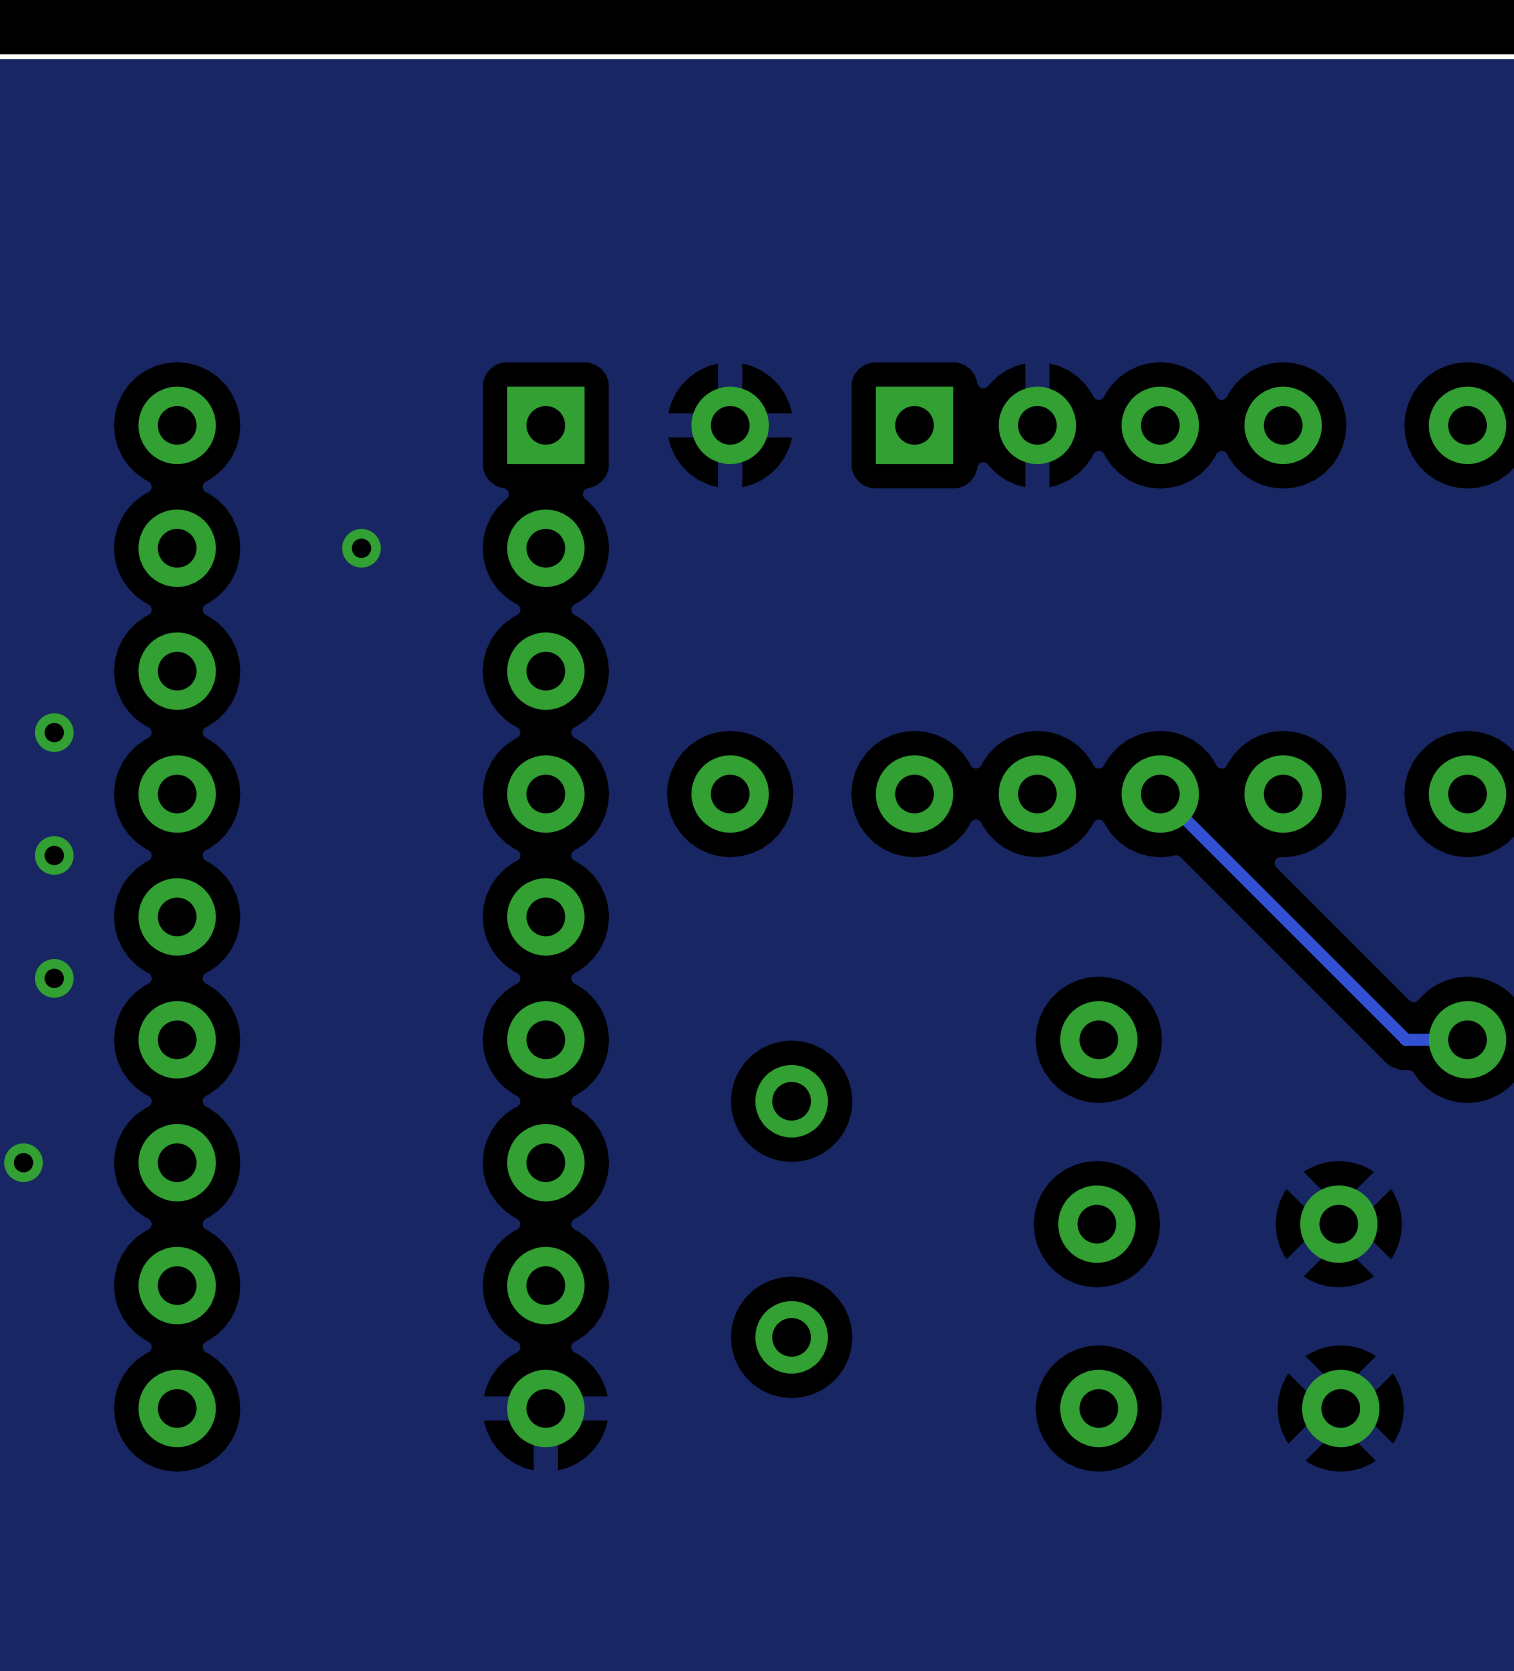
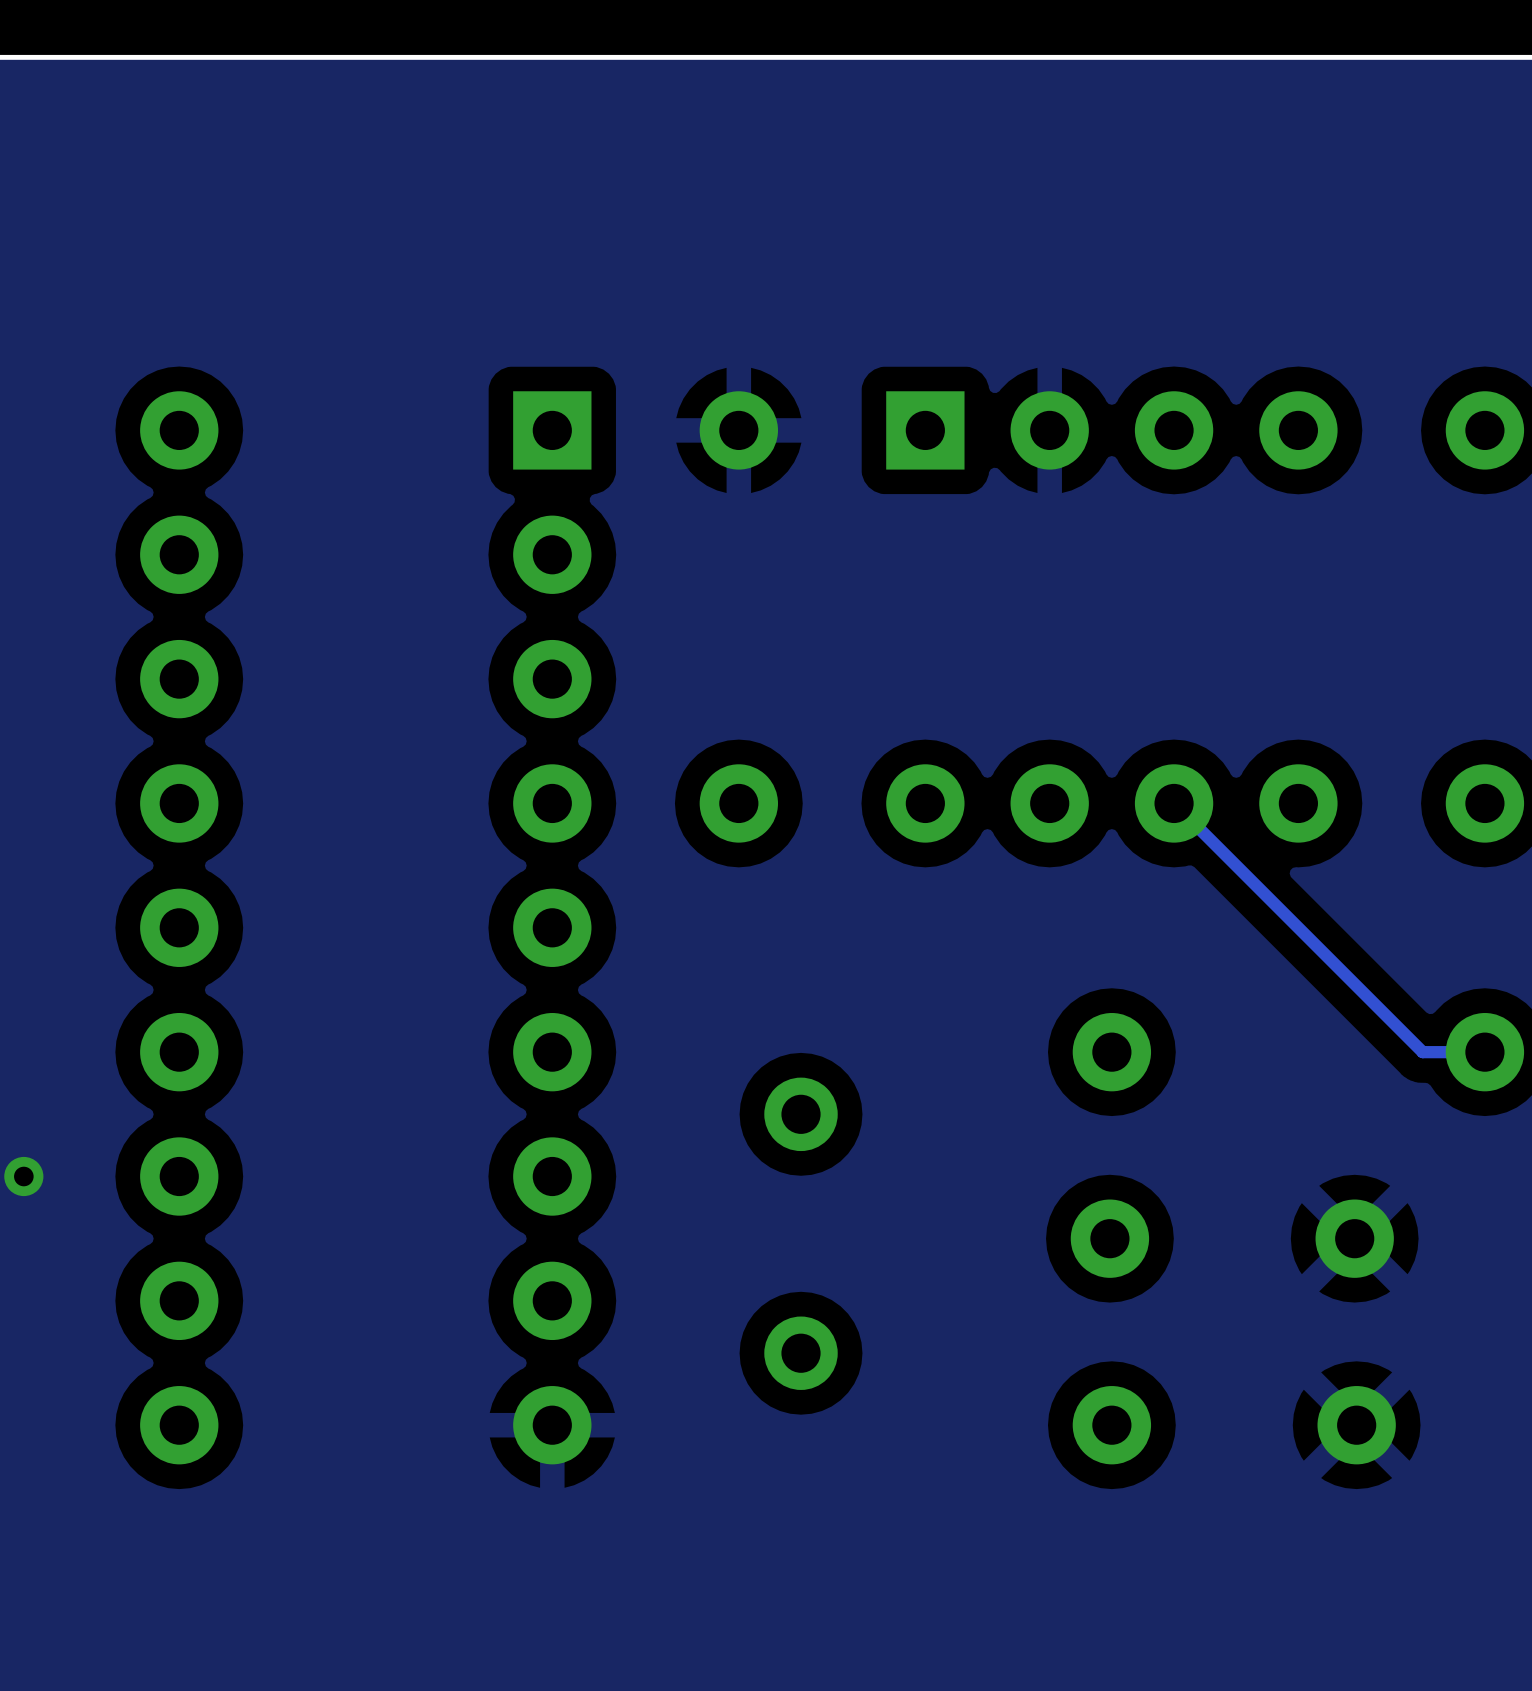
via: (361, 548) -> none
via: (54, 732) -> none
via: (54, 855) -> none
via: (54, 978) -> none

